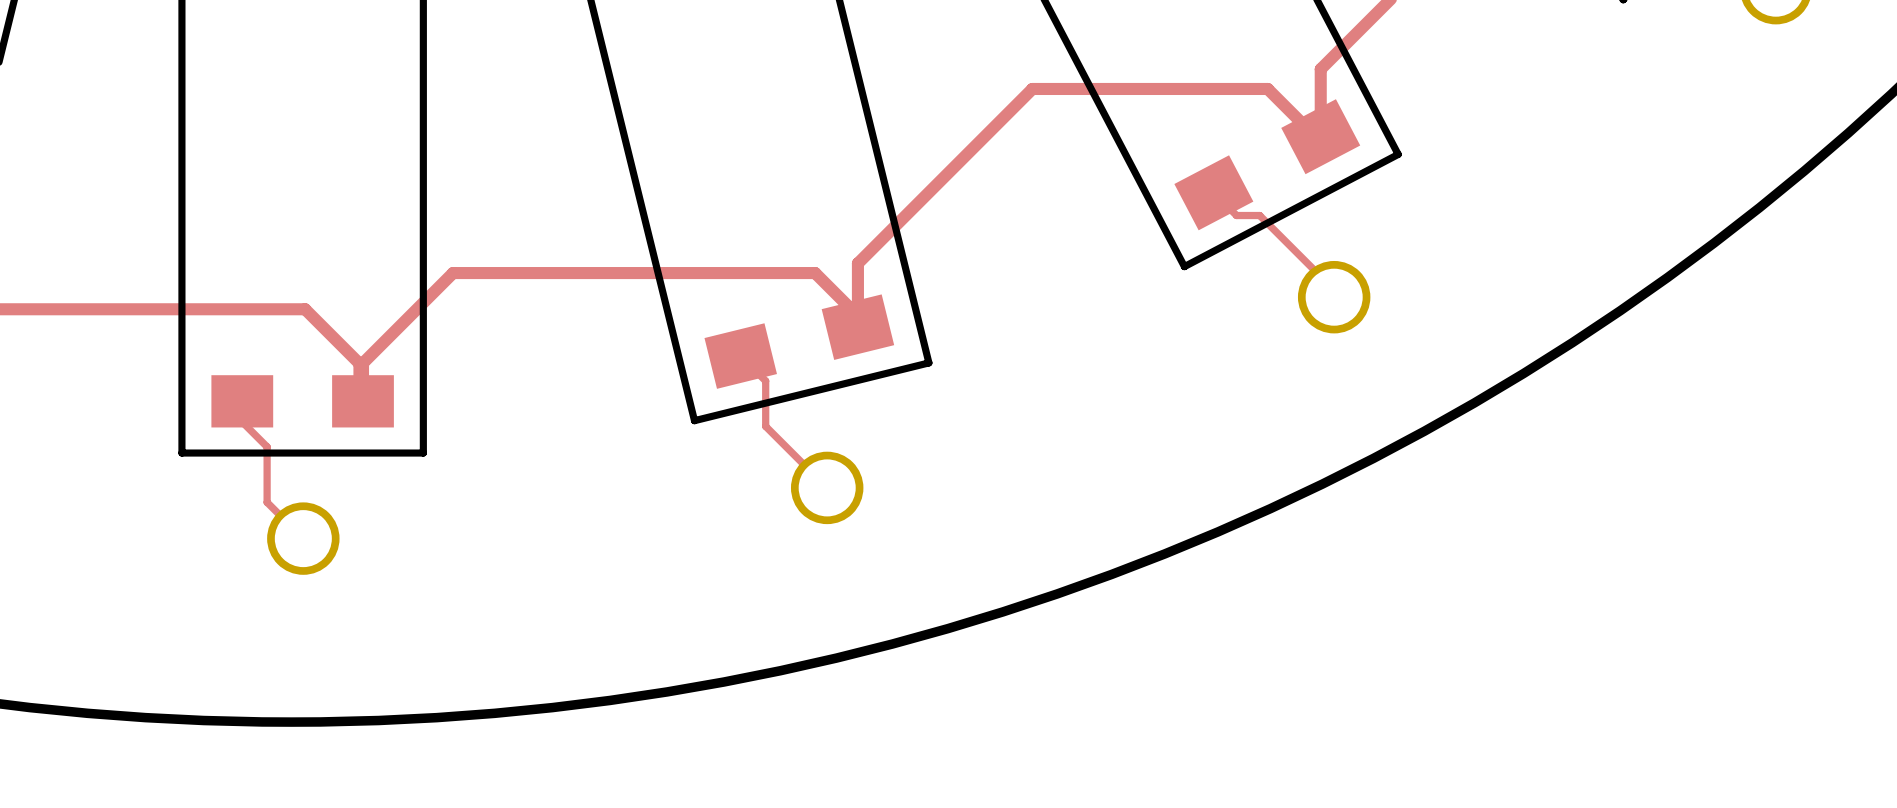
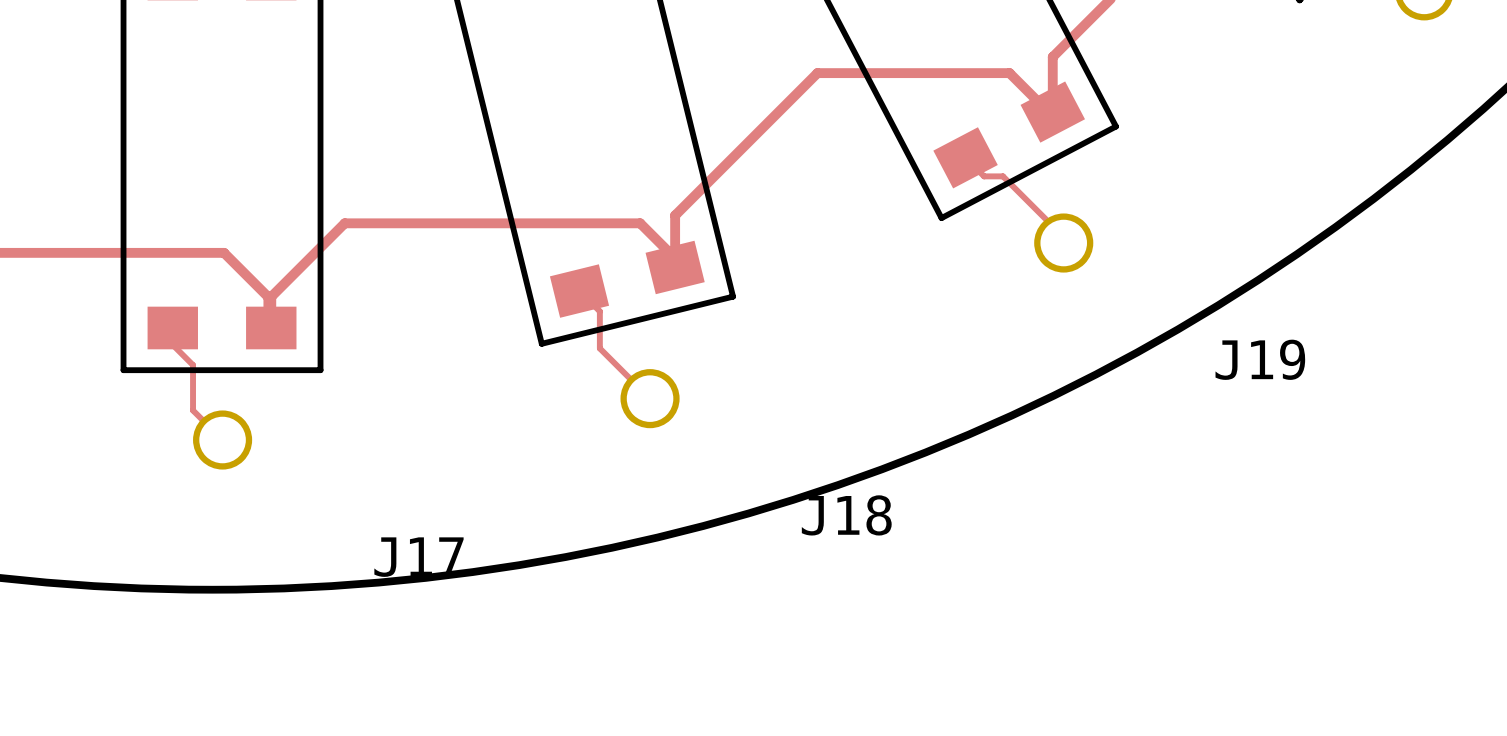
J19 name: none -> J19 (1260, 359)
J18 name: none -> J18 (846, 515)
J17 name: none -> J17 (418, 557)

